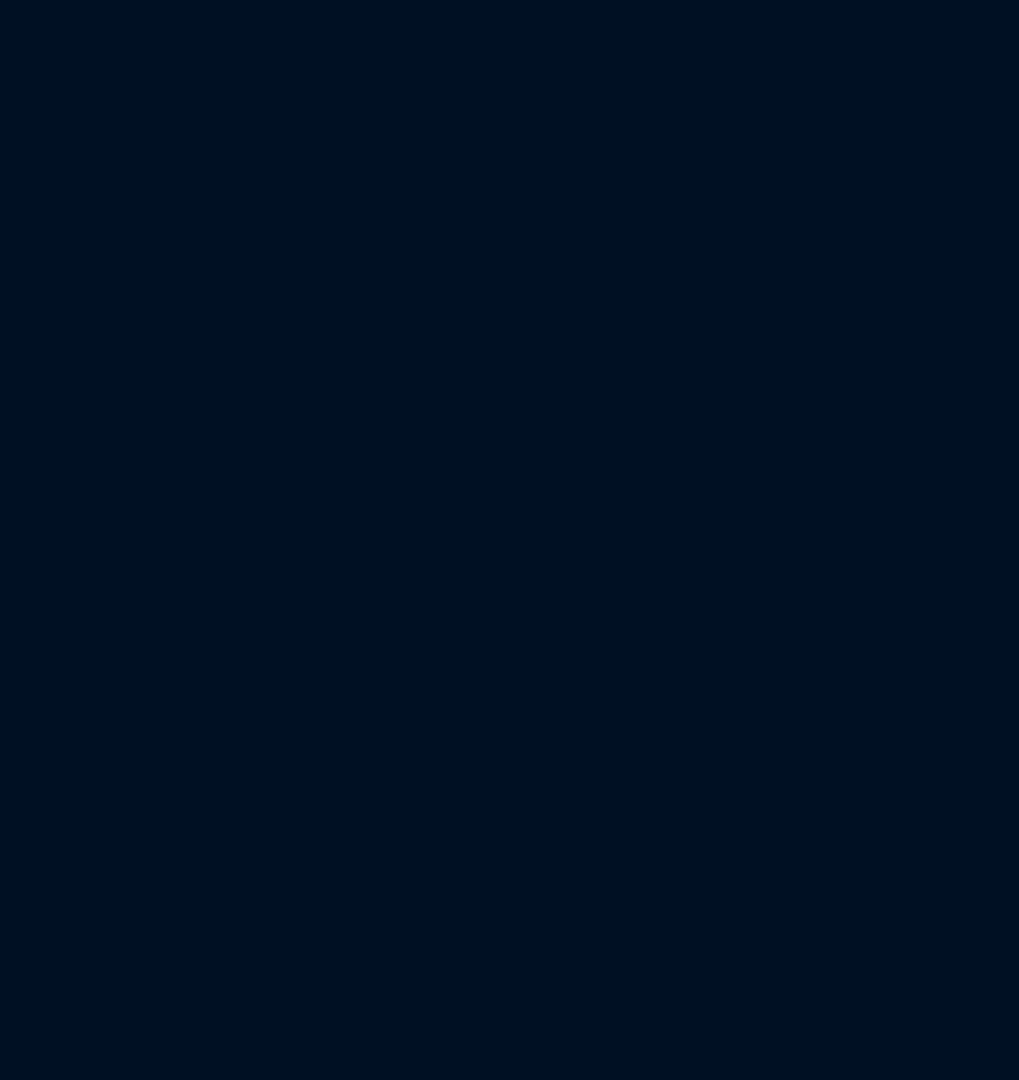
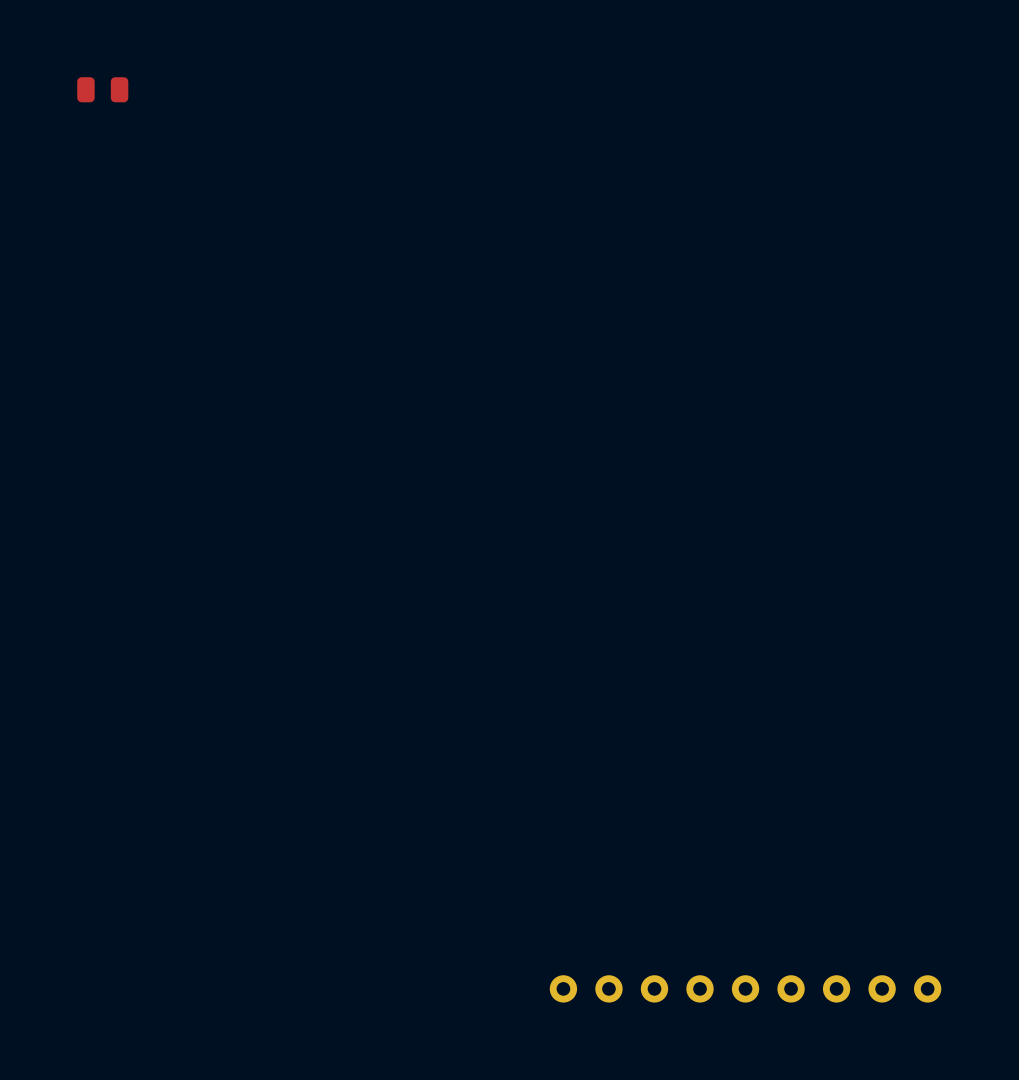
part: none -> (102, 89)
part: none -> (745, 988)

